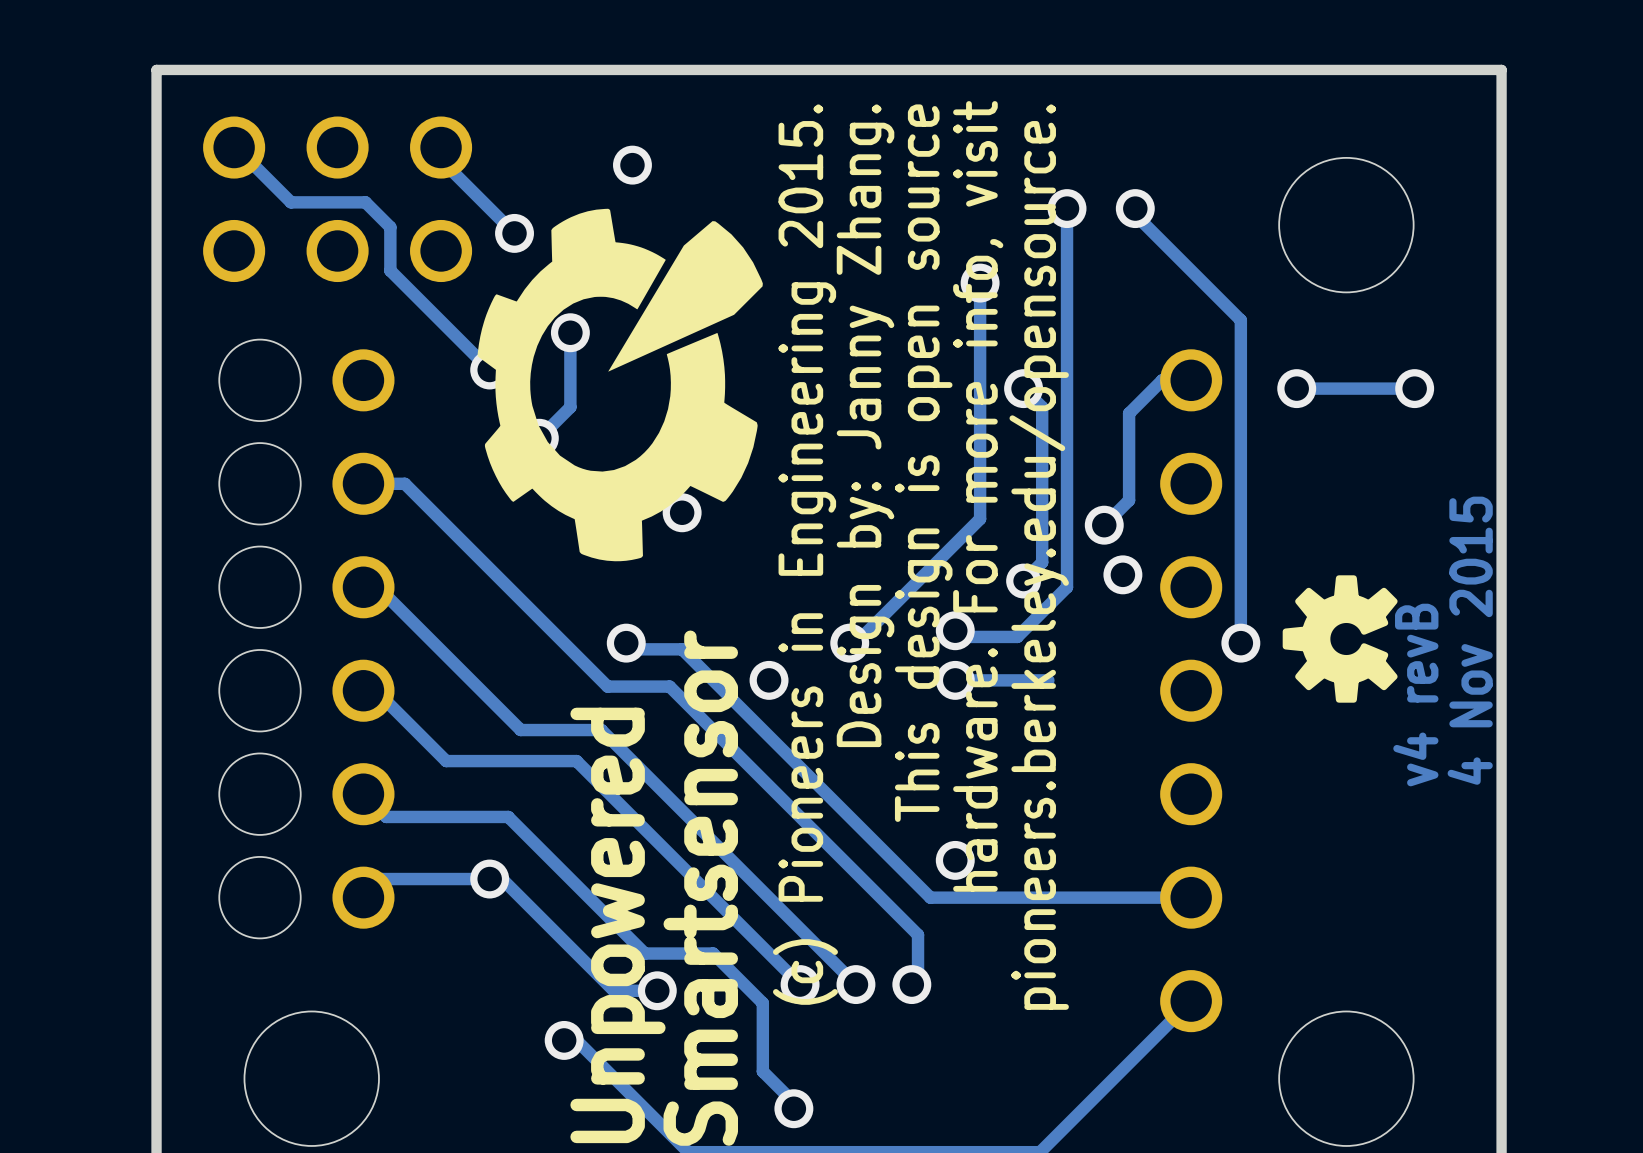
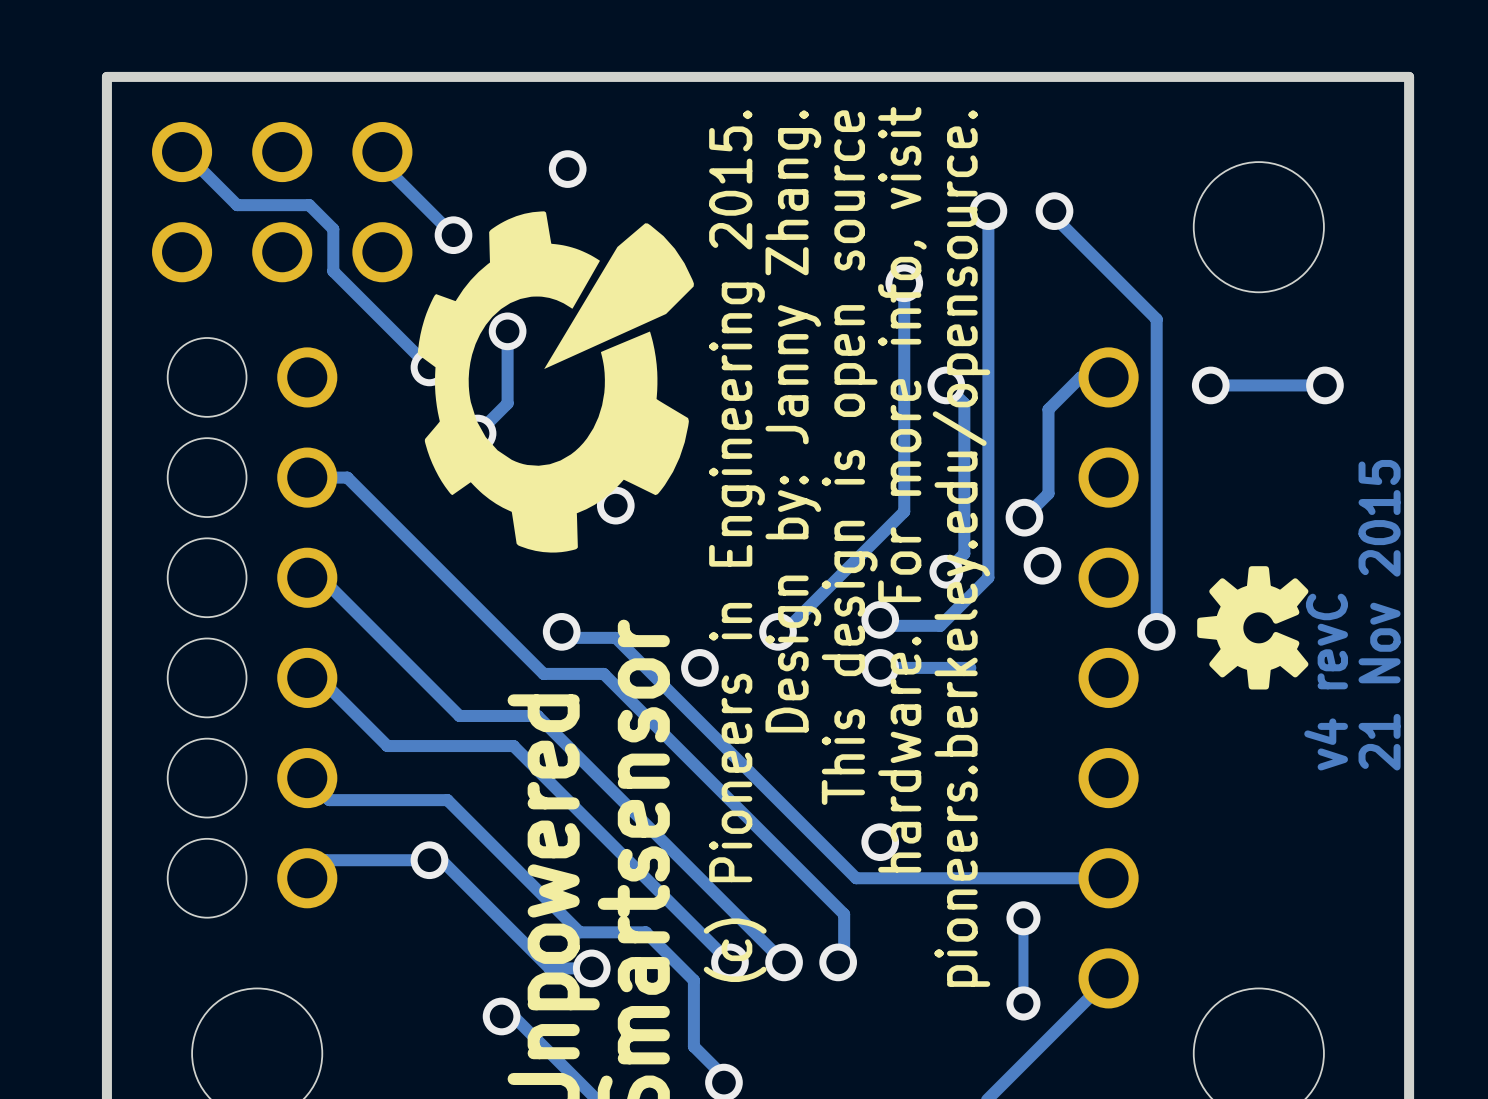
text: 4 Nov 2015 (1470, 640) -> 21 Nov 2015 (1379, 615)
text: v4 revB (1415, 695) -> v4 revC (1326, 682)
track: none -> (1023, 918) (1023, 1003)
via: none -> (1023, 918)
via: none -> (1023, 1003)

